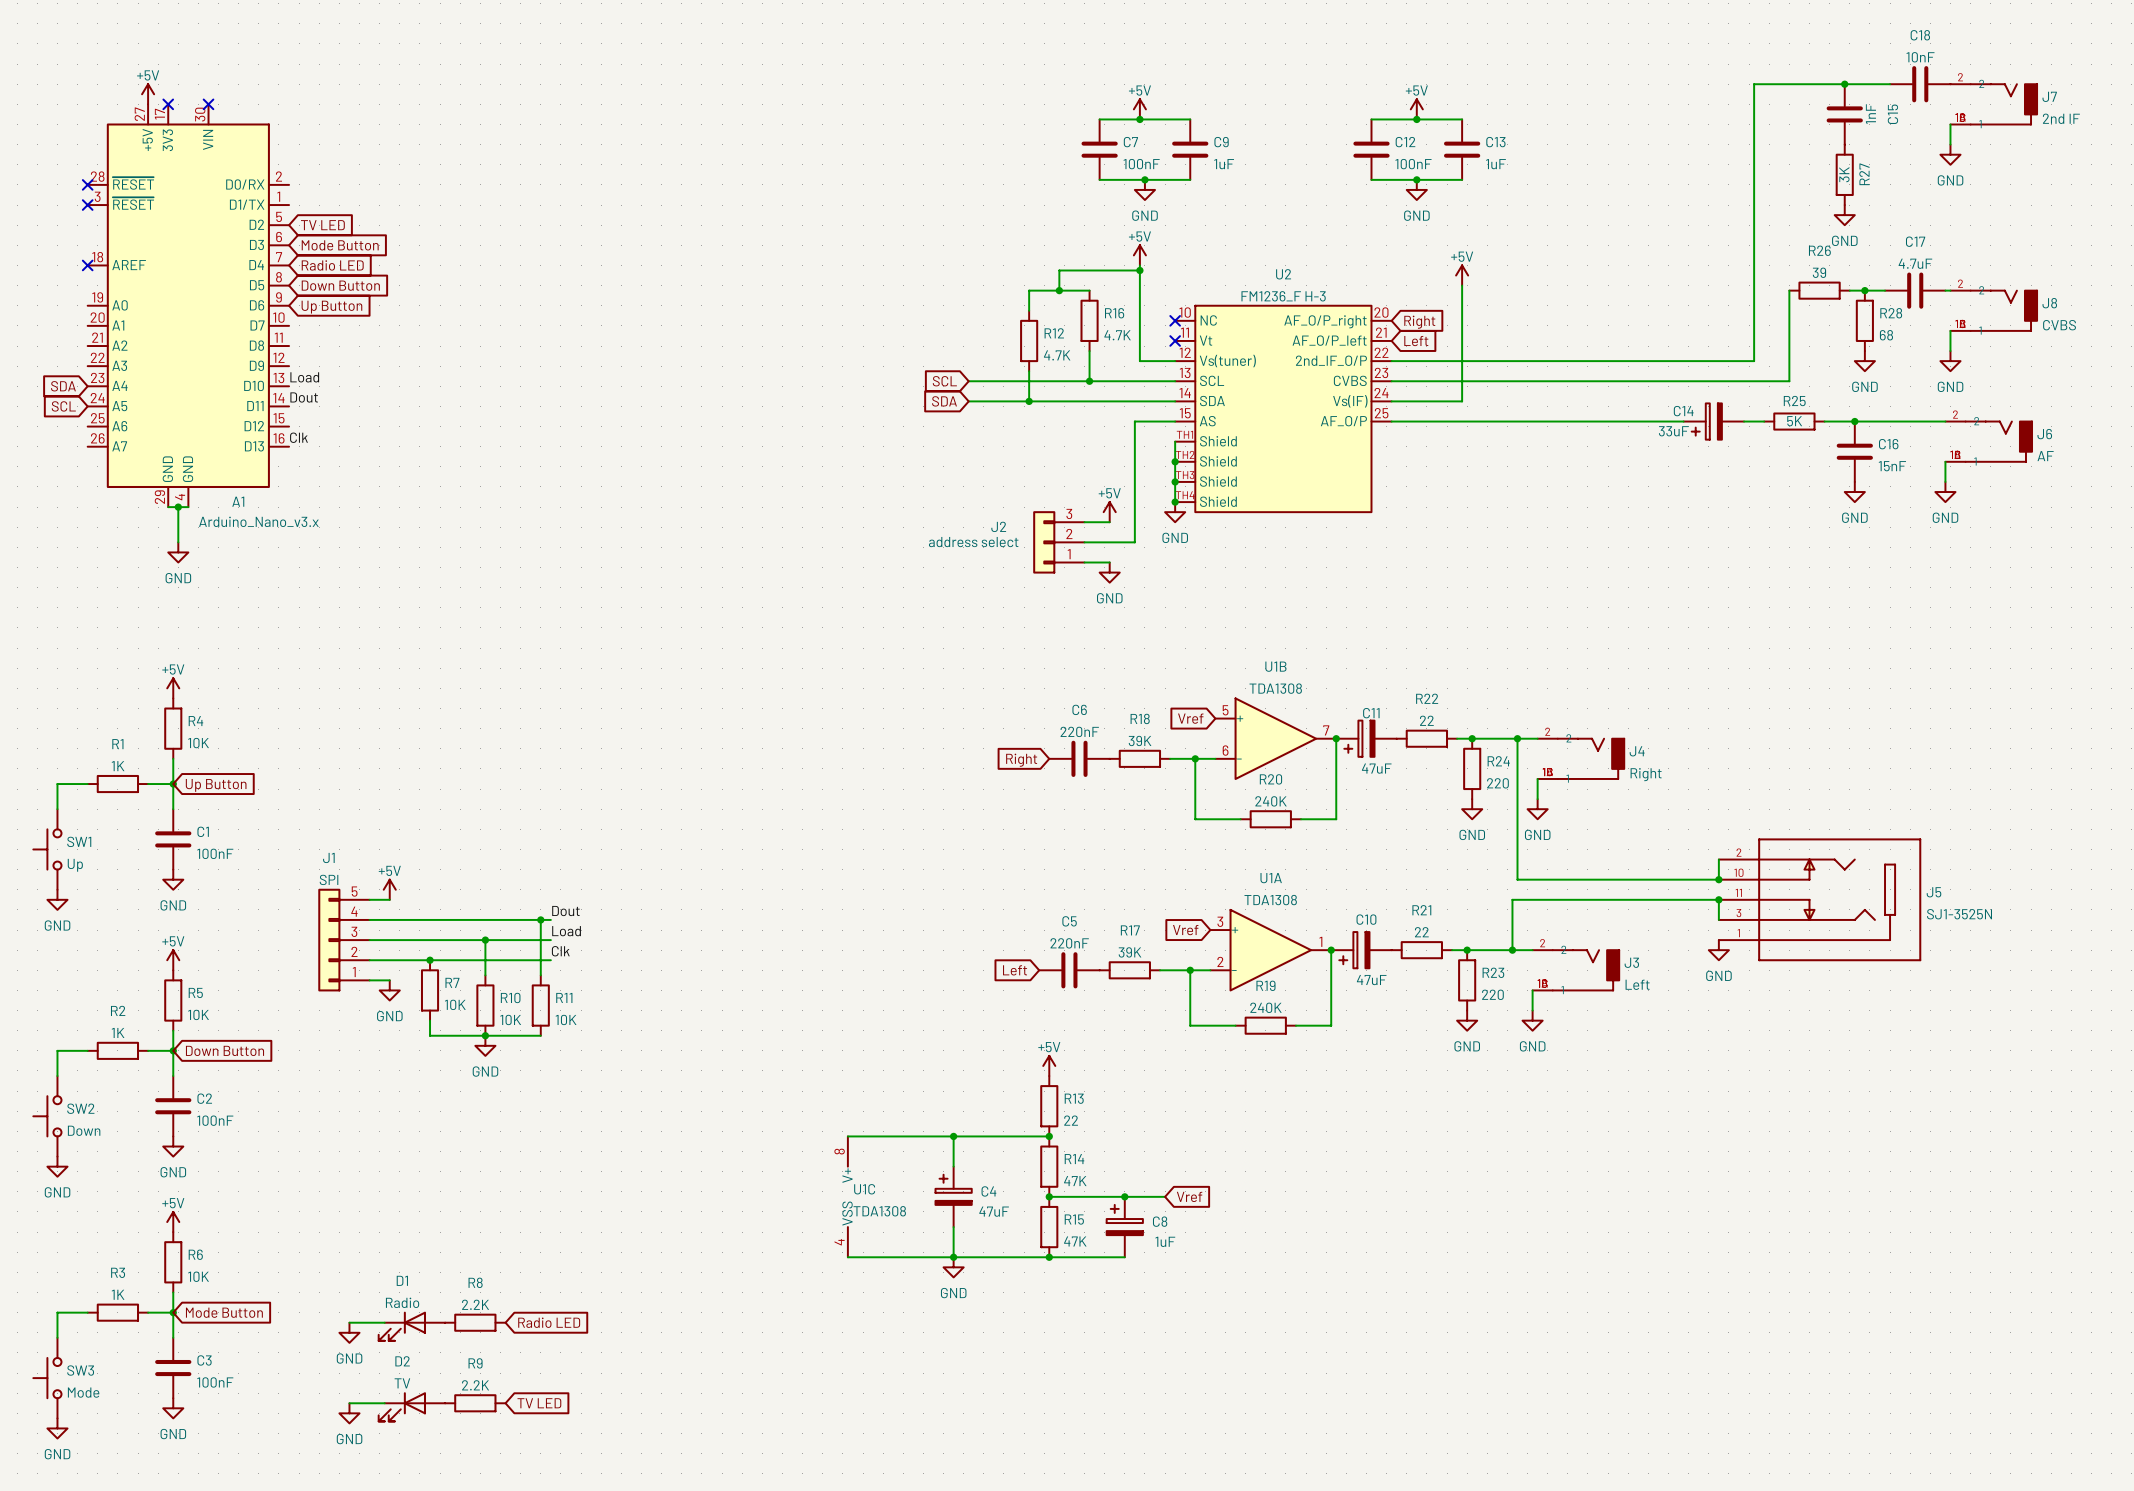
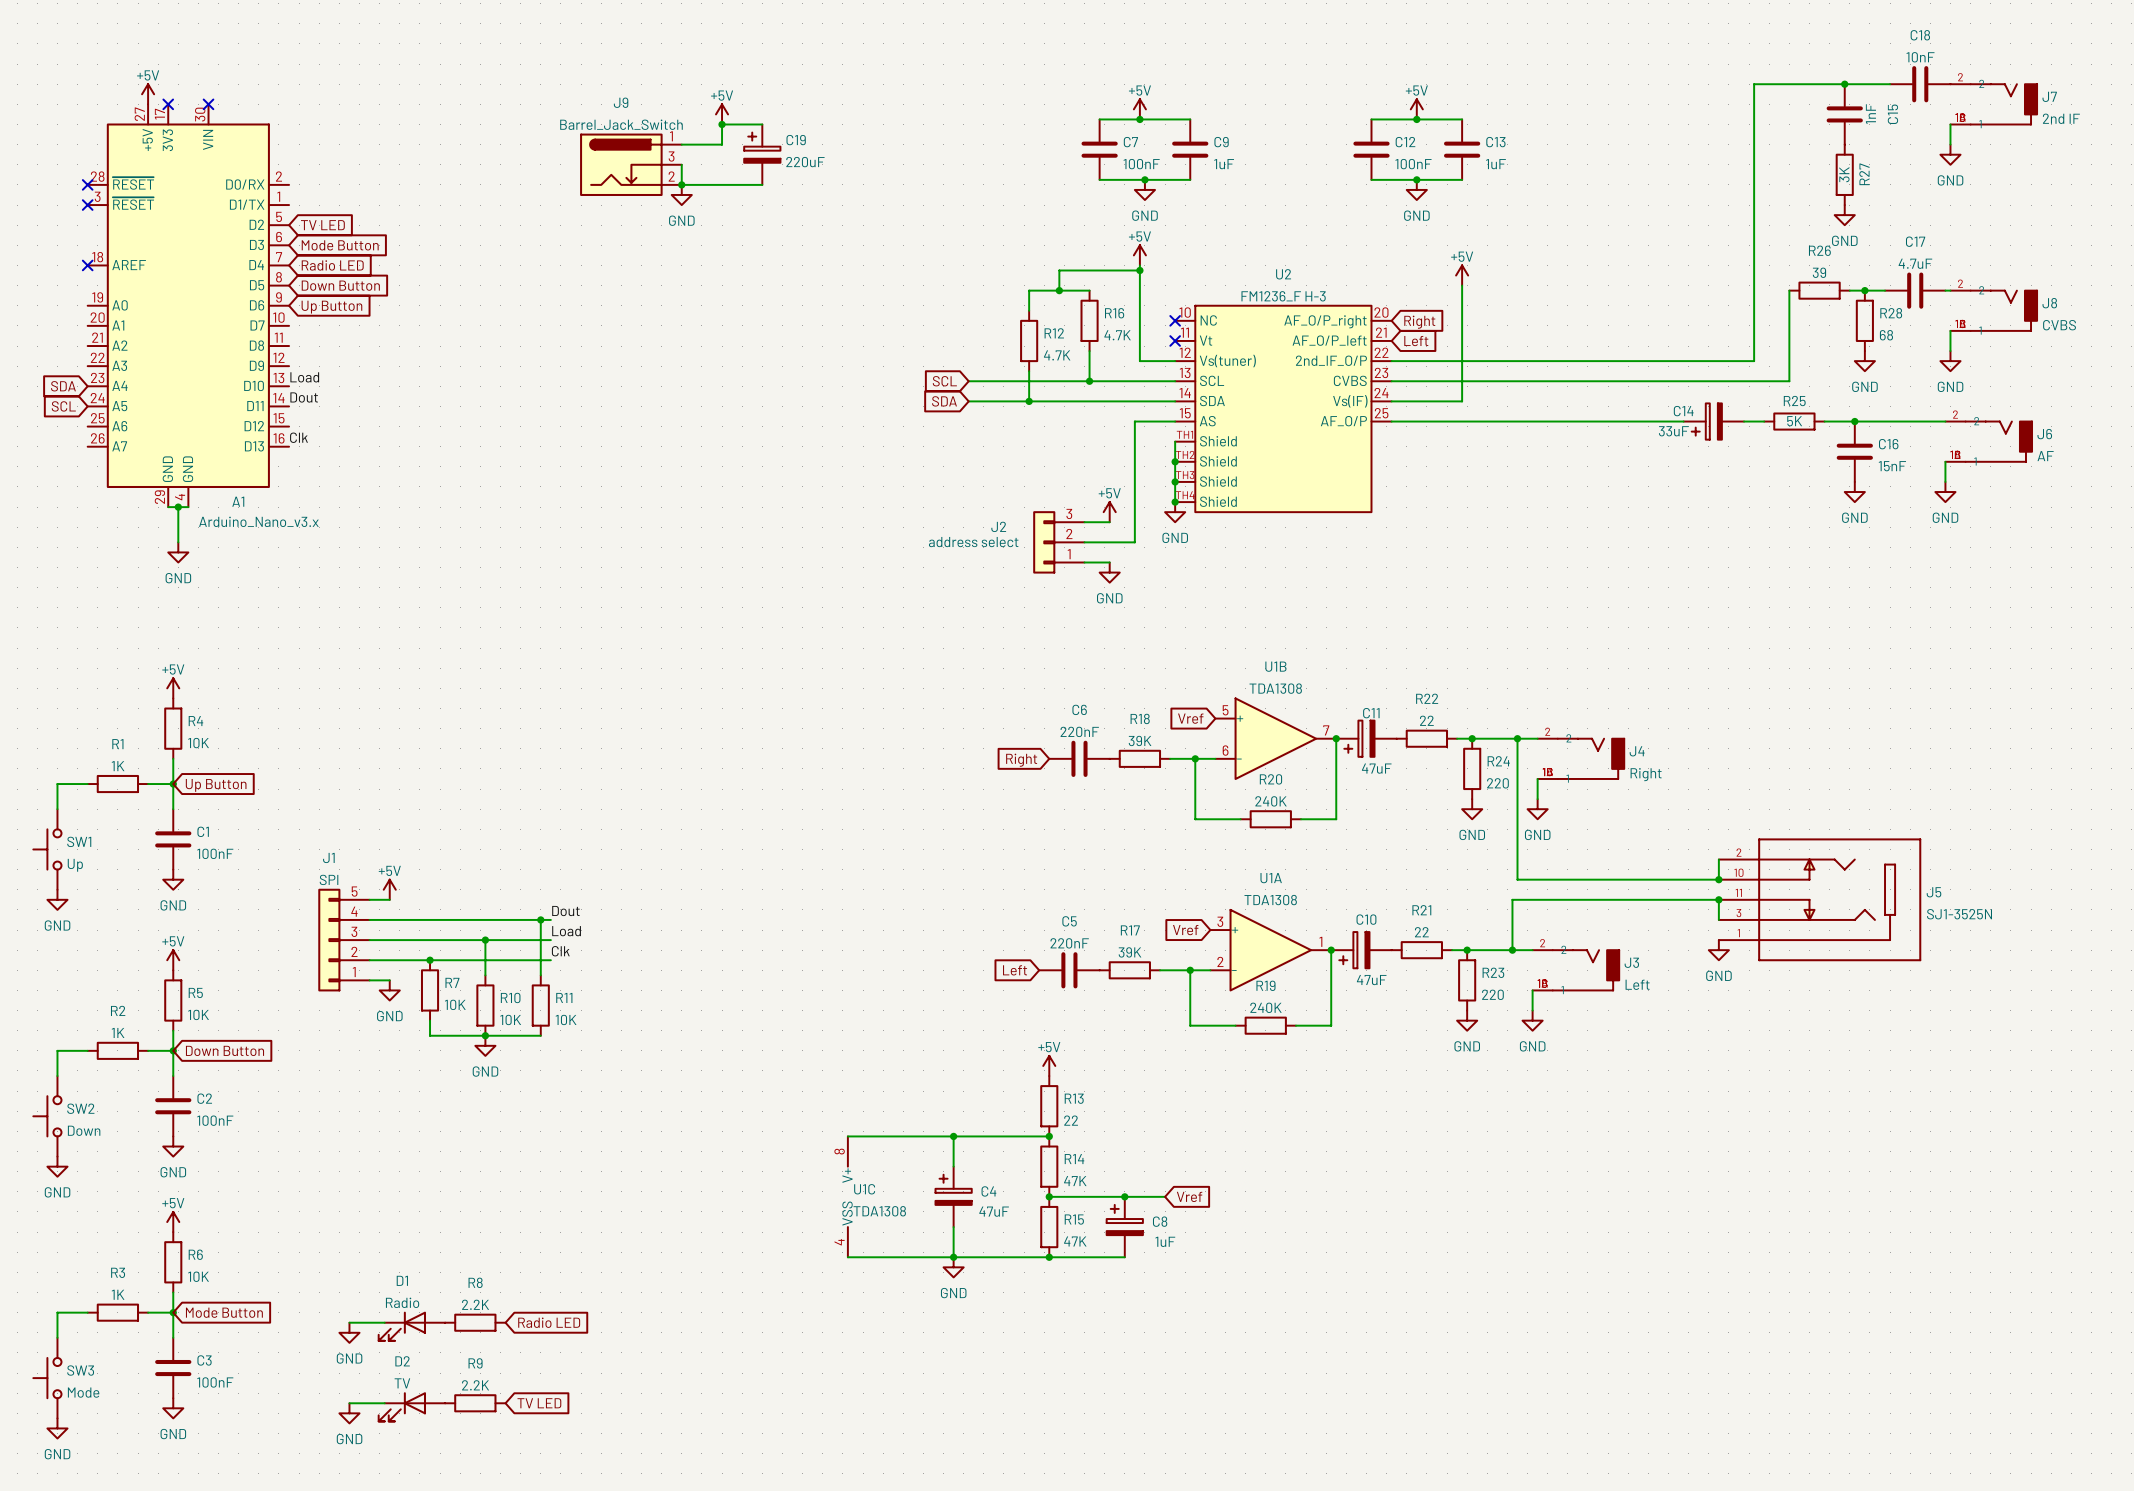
power symbol: none -> +5V (722, 114)
junction: none -> (722, 124)
wire: none -> (762, 124) (722, 124) (722, 144) (681, 144)
C19: none -> 220uF (762, 154)
J9: none -> Barrel_Jack_Switch (630, 164)
wire: none -> (681, 164) (681, 184) (762, 184)
junction: none -> (681, 184)
power symbol: none -> GND (681, 194)

